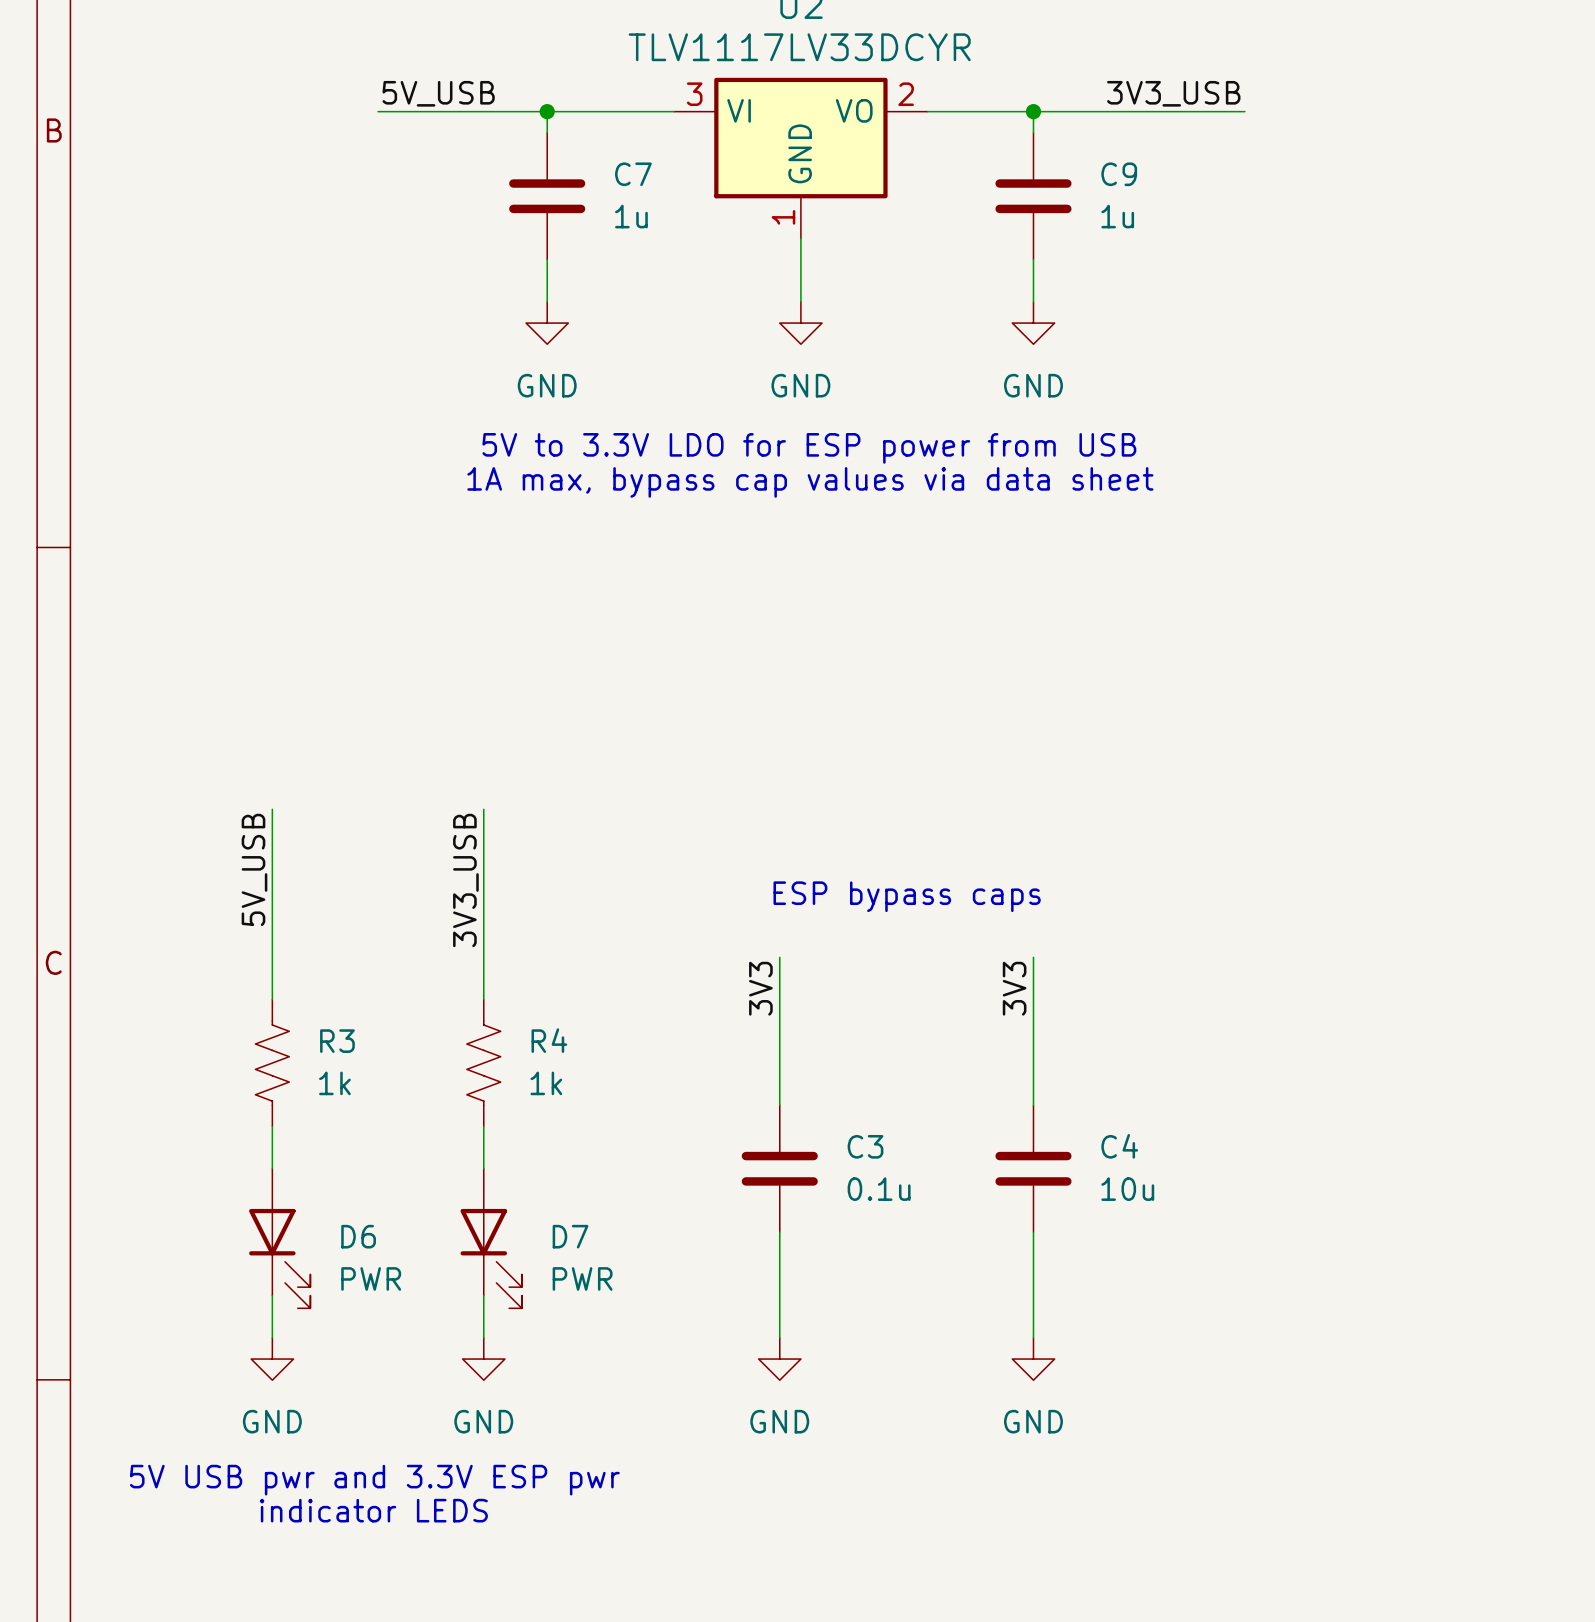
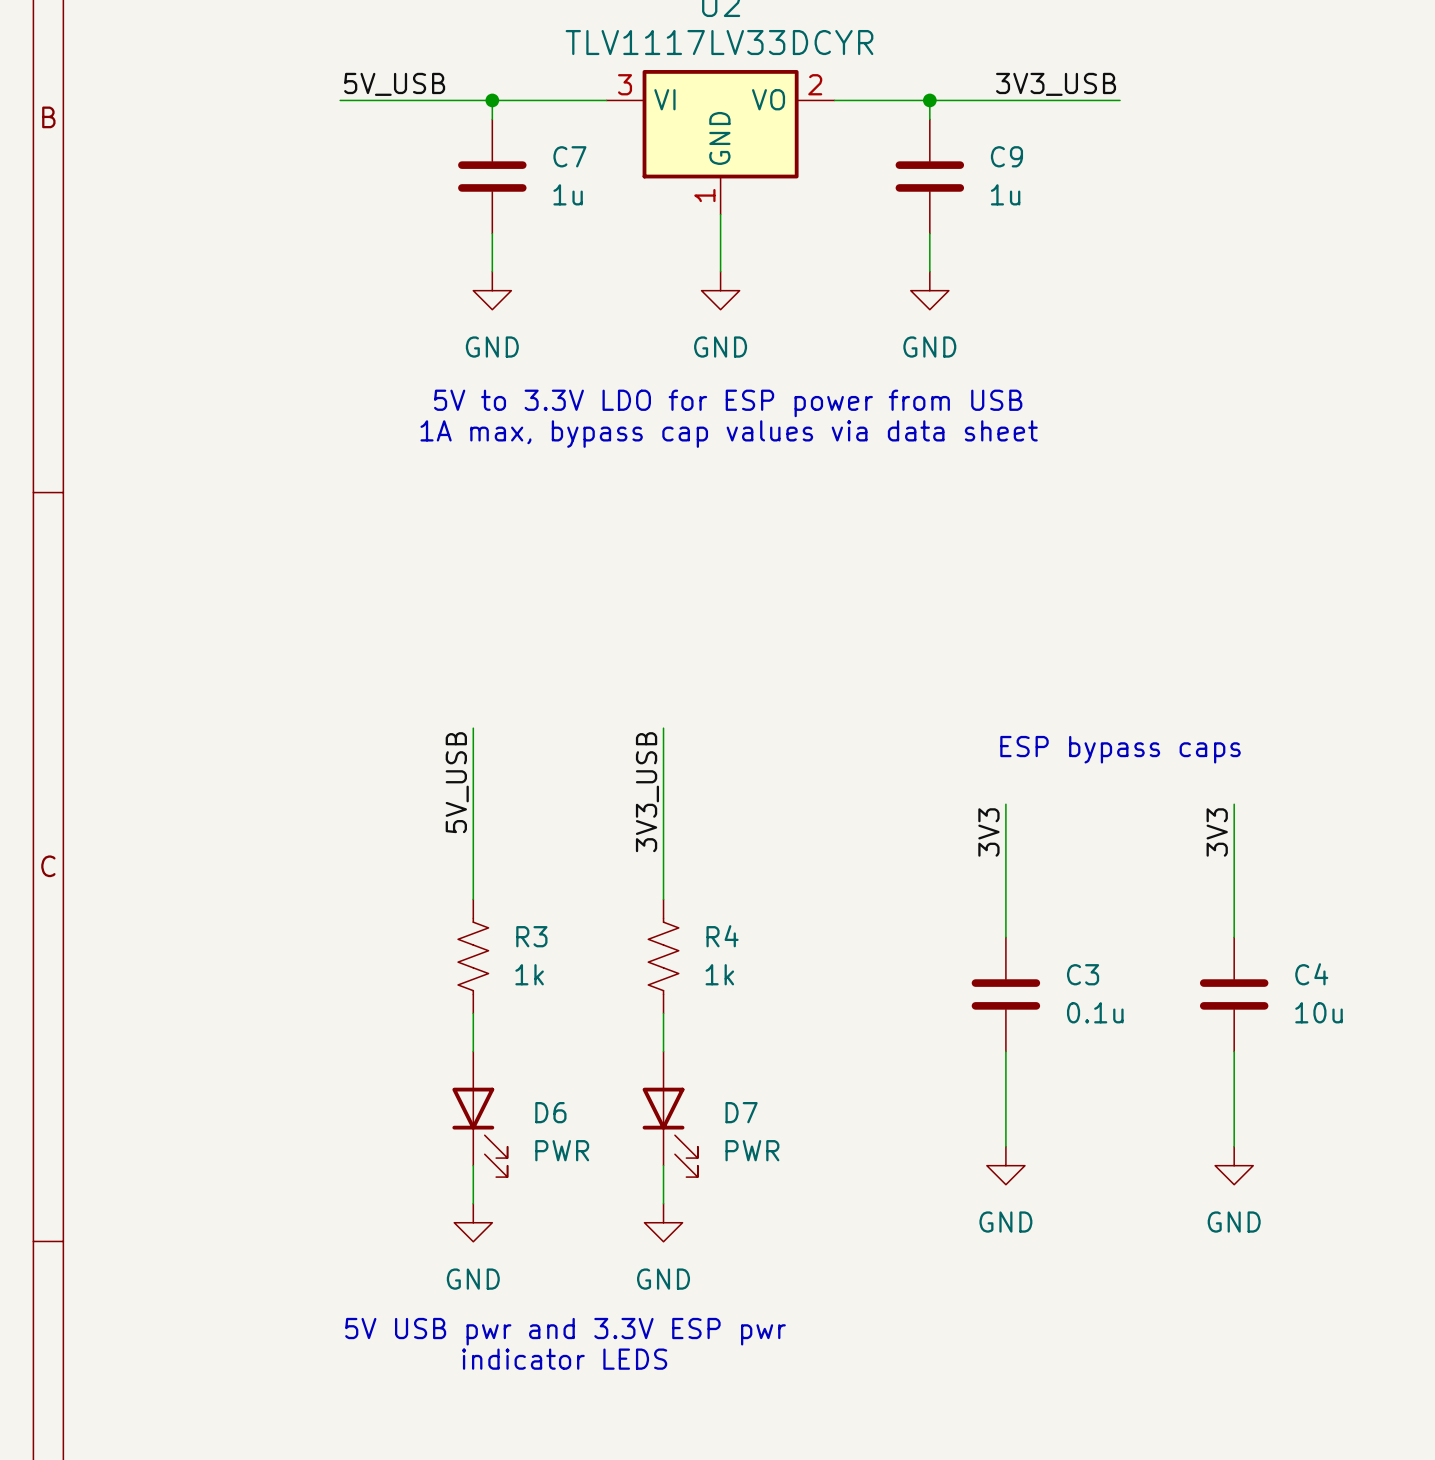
wire: (272, 809) (272, 999) -> (473, 728) (473, 899)
wire: (483, 809) (483, 999) -> (663, 728) (663, 899)
label position: 5V_USB (254, 869) -> 5V_USB (457, 782)
label position: 3V3_USB (465, 880) -> 3V3_USB (647, 792)
text position: ESP bypass caps (907, 896) -> ESP bypass caps (1120, 749)
label: none -> 3V3 (1217, 832)
wire: (779, 957) (779, 1105) -> (1005, 804) (1005, 937)
wire: (1033, 957) (1033, 1105) -> (1234, 804) (1234, 937)
label: 3V3 (760, 988) -> none
label position: 3V3 (1014, 988) -> 3V3 (988, 832)
R3 position: (272, 1063) -> (473, 956)
R4 position: (483, 1063) -> (663, 956)
wire: (272, 1126) (272, 1168) -> (473, 1013) (473, 1051)
wire: (483, 1126) (483, 1168) -> (663, 1013) (663, 1051)
C3 position: (779, 1168) -> (1005, 994)
C4 position: (1033, 1168) -> (1234, 994)
wire: (779, 1232) (779, 1337) -> (1005, 1051) (1005, 1146)
wire: (1033, 1232) (1033, 1337) -> (1234, 1051) (1234, 1146)
D6 position: (279, 1238) -> (479, 1114)
D7 position: (491, 1238) -> (670, 1114)
wire: (272, 1295) (272, 1337) -> (473, 1165) (473, 1203)
wire: (483, 1295) (483, 1337) -> (663, 1165) (663, 1203)
power symbol: none -> GND (1234, 1165)
power symbol: GND (272, 1359) -> none
power symbol position: GND (483, 1359) -> GND (473, 1222)
power symbol position: GND (779, 1359) -> GND (663, 1222)
power symbol position: GND (1033, 1359) -> GND (1005, 1165)
text position: 5V USB pwr and 3.3V ESP pwr (374, 1480) -> 5V USB pwr and 3.3V ESP pwr (565, 1331)
text position: indicator LEDS (373, 1510) -> indicator LEDS (564, 1359)

